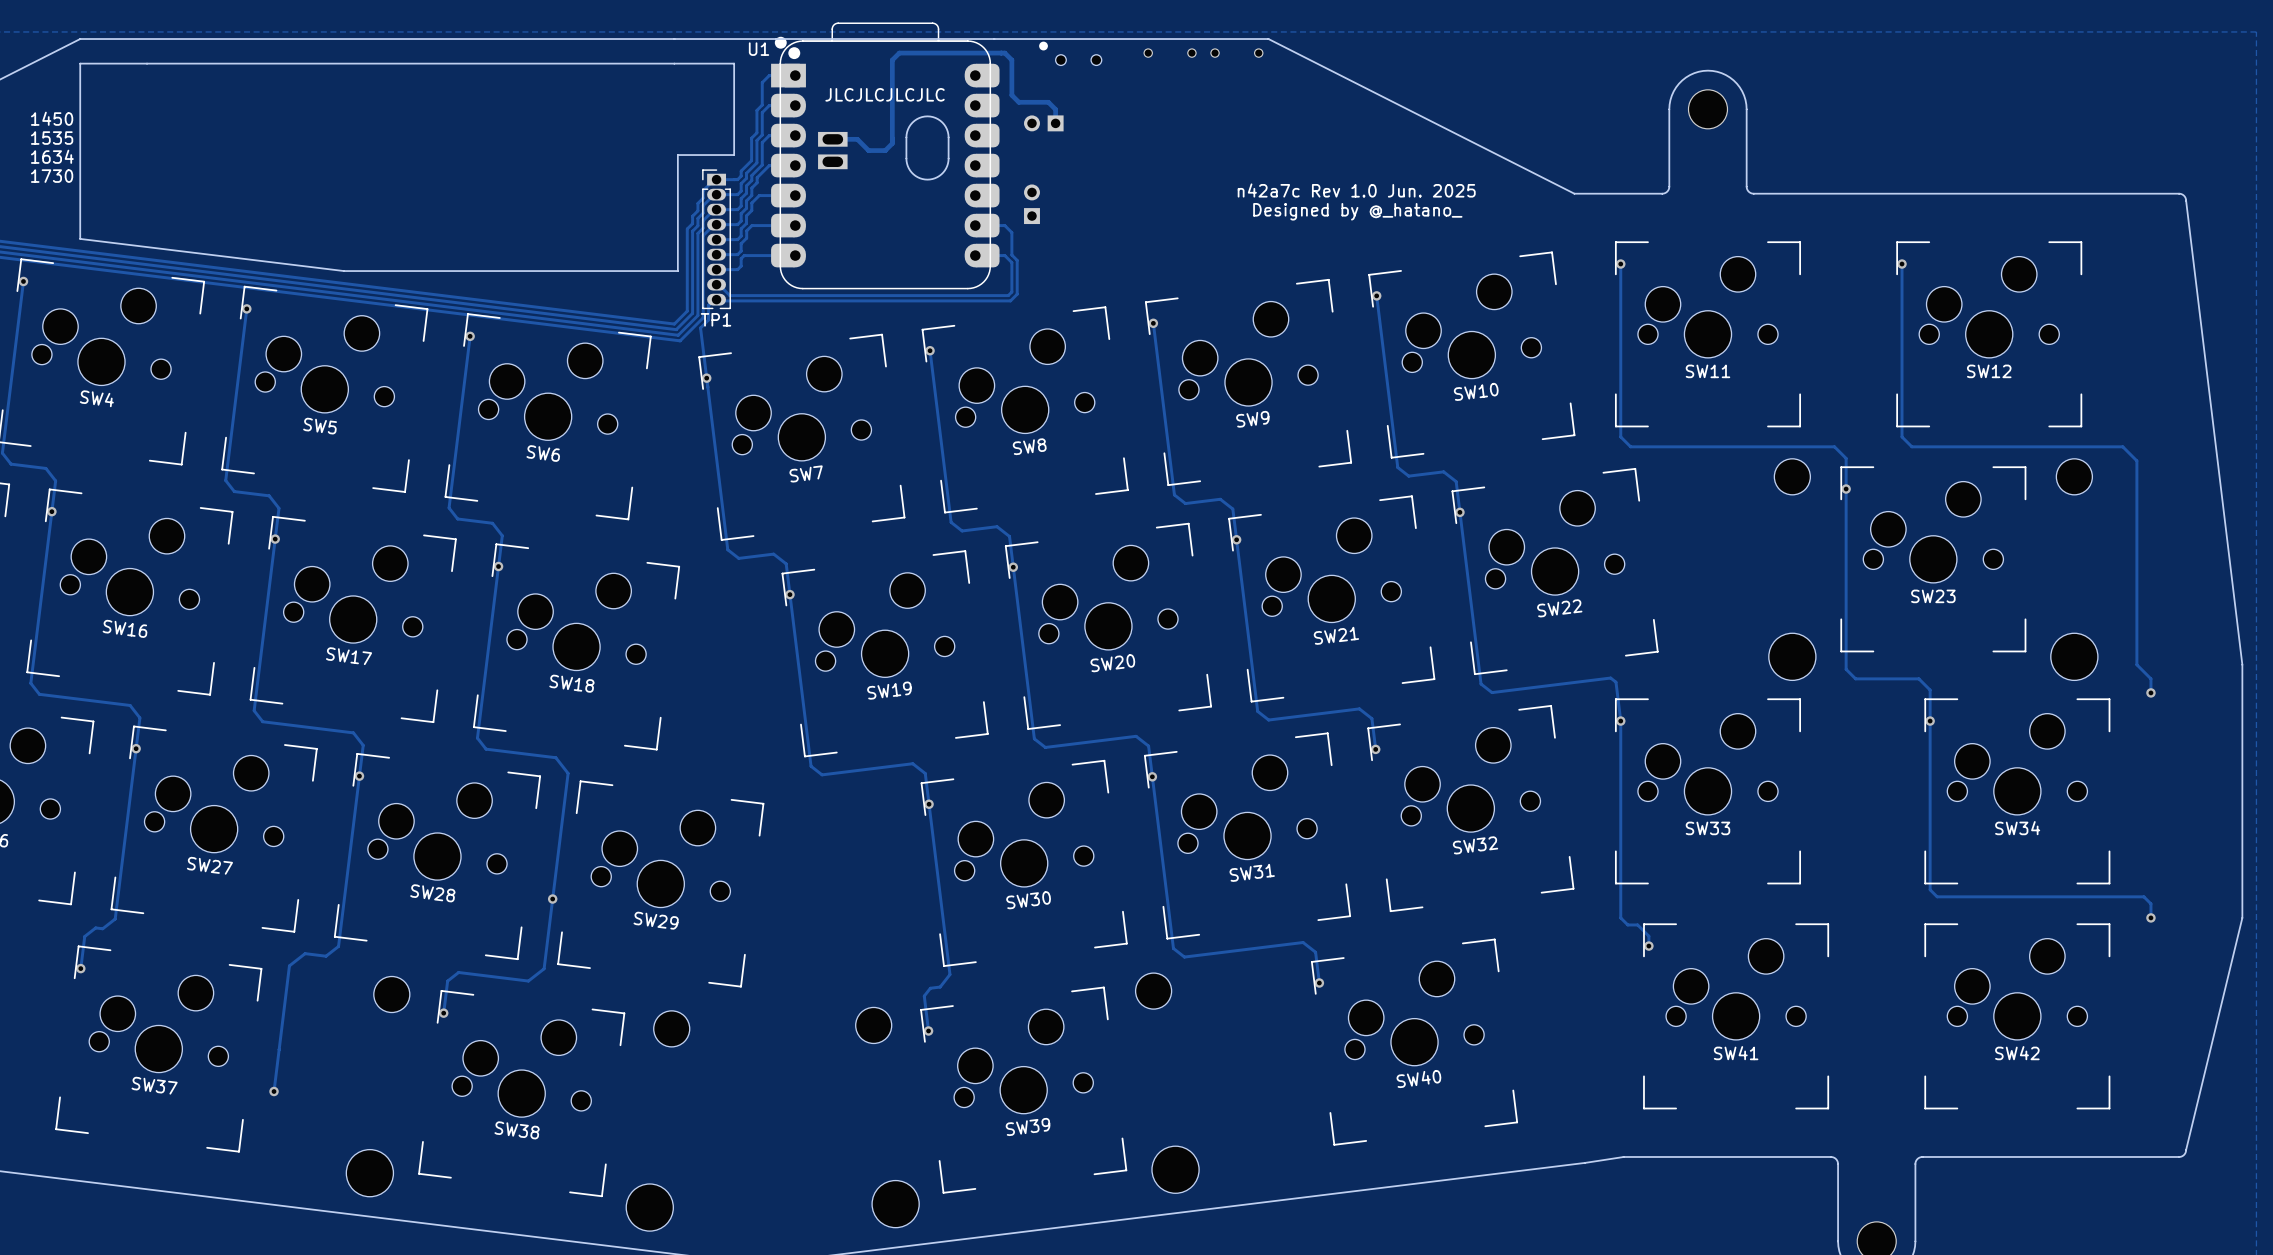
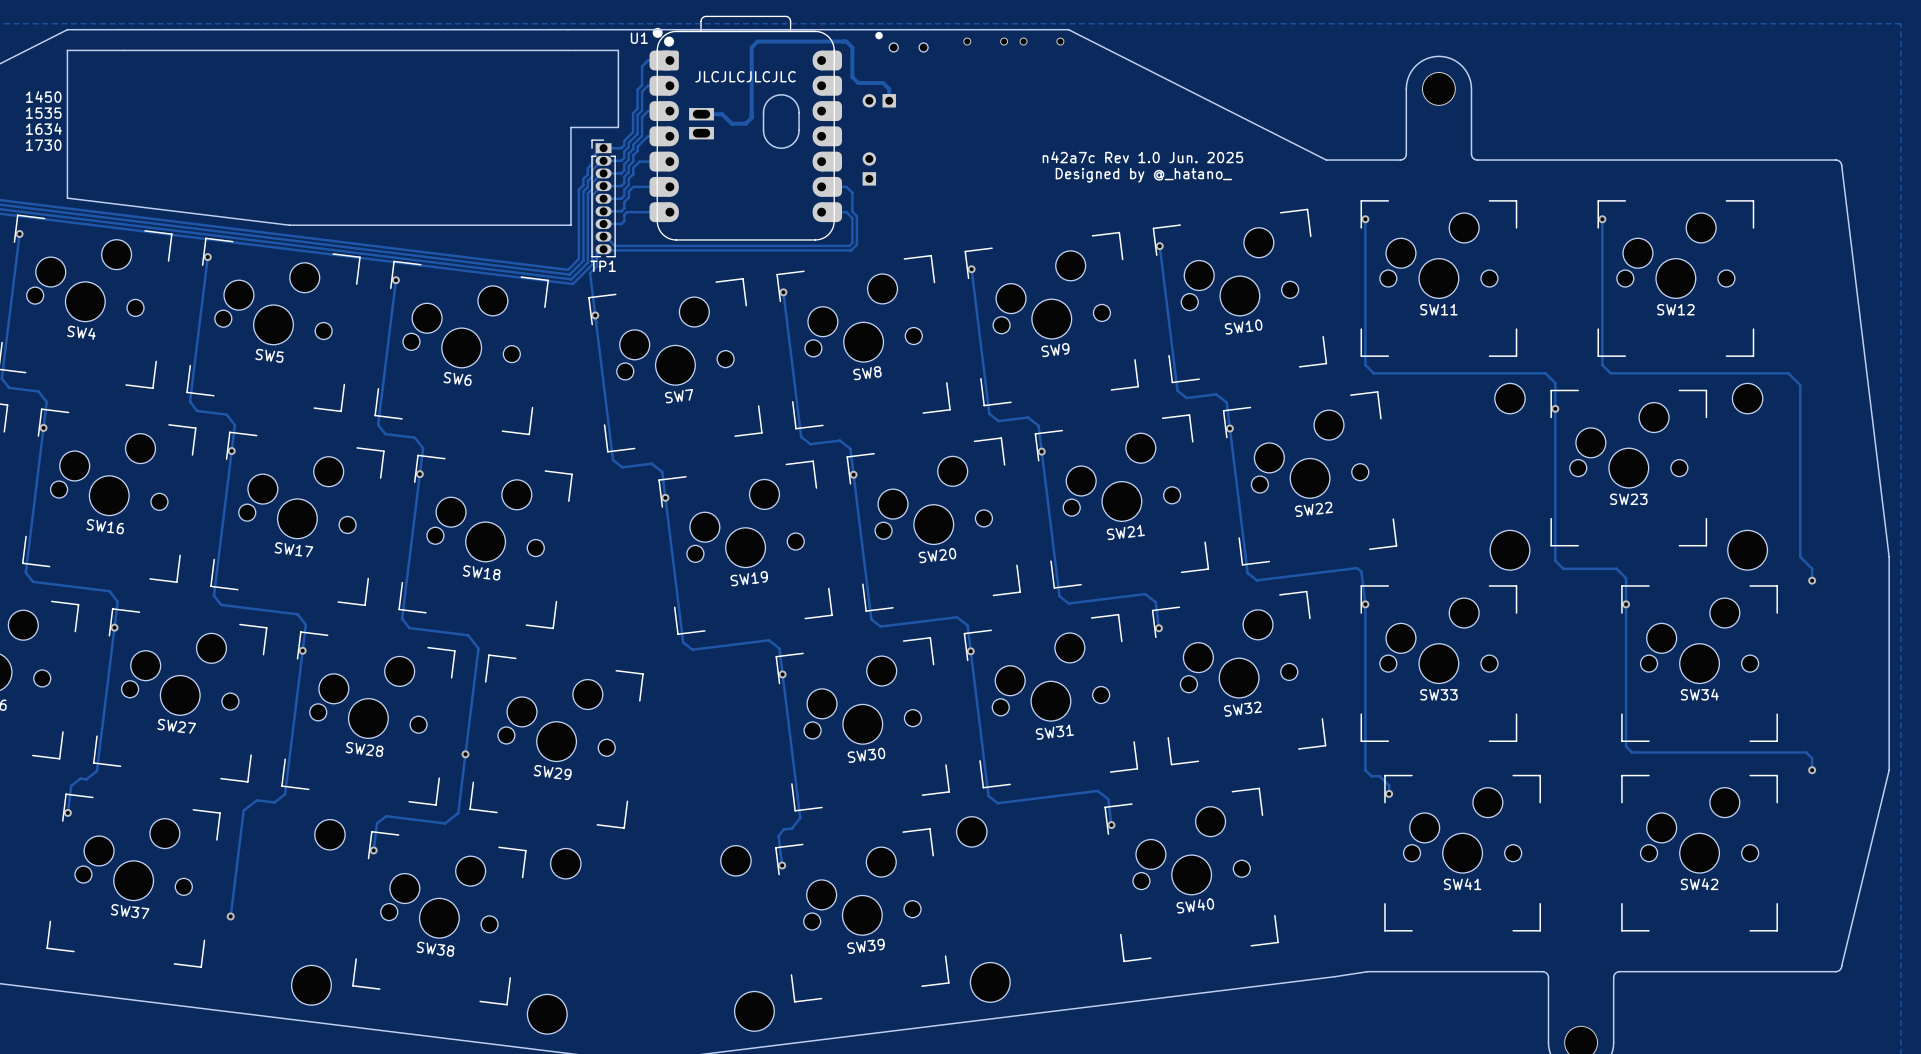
U1 footprint: [771, 22, 1000, 290] -> [649, 15, 842, 241]

